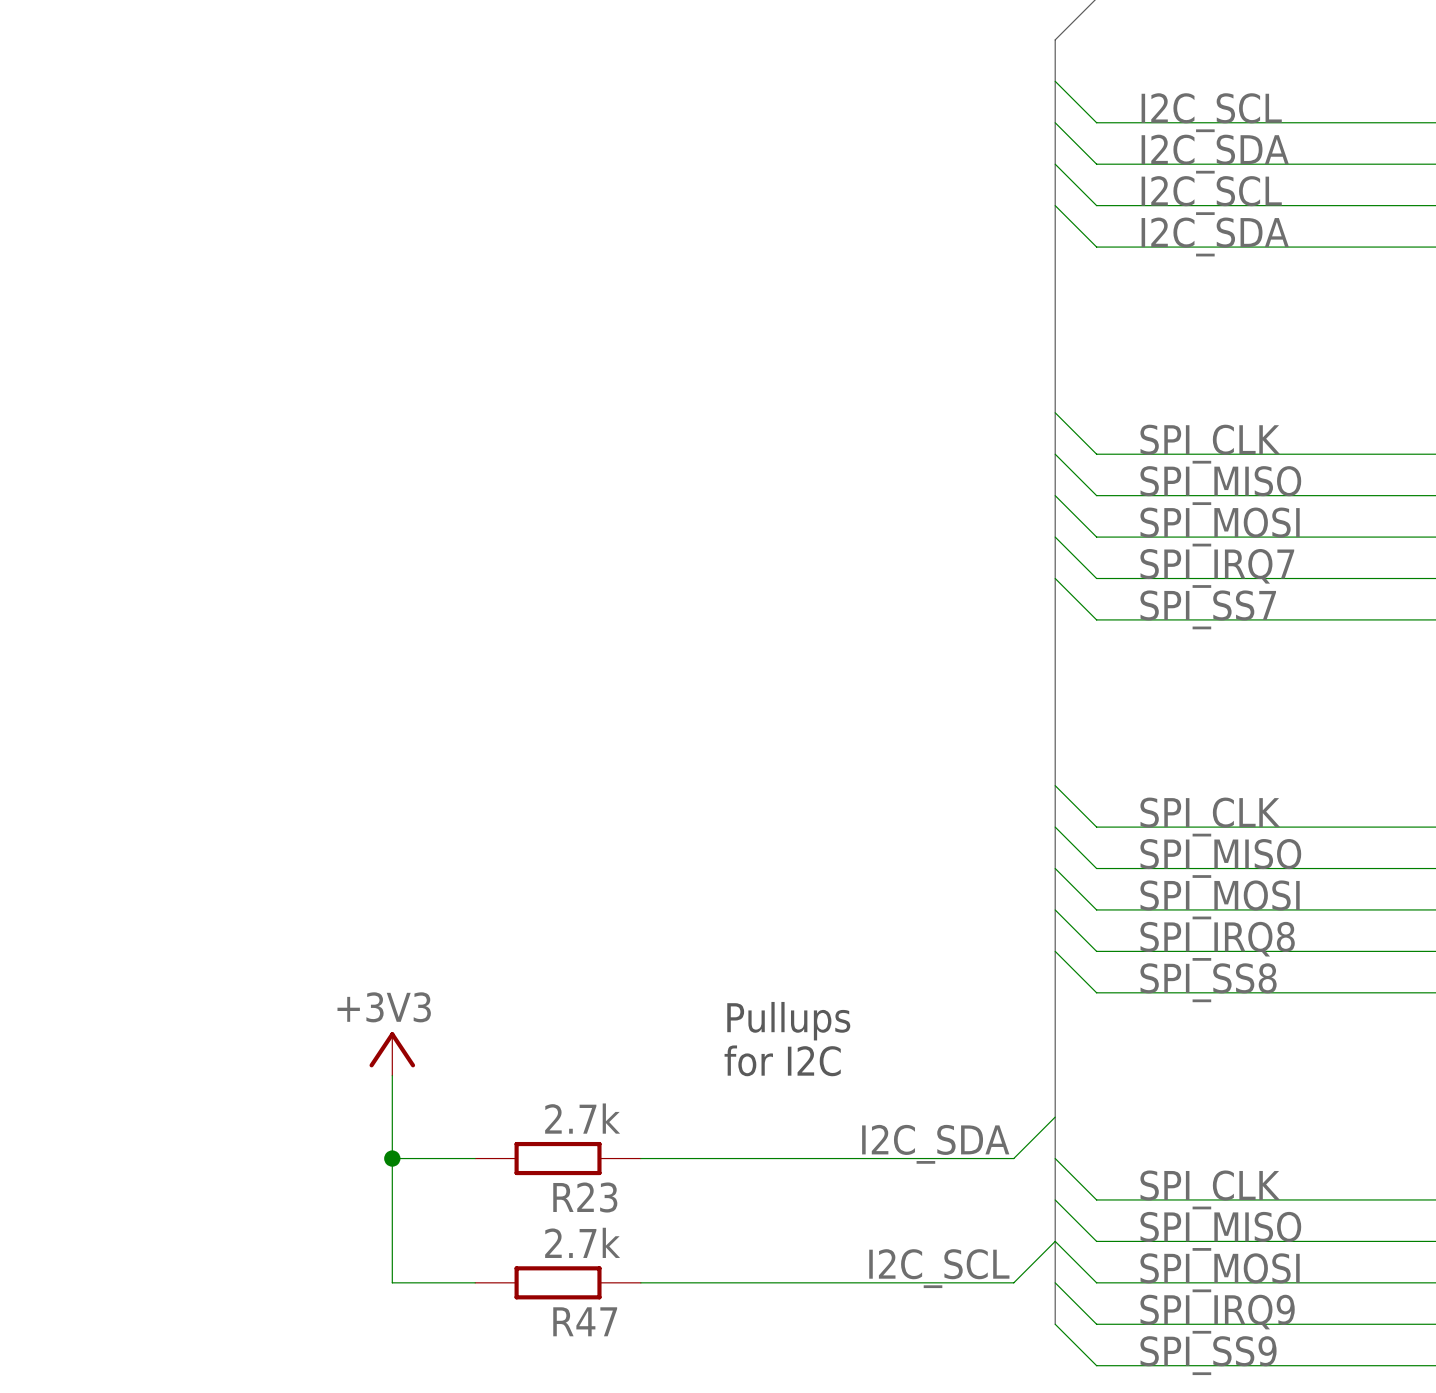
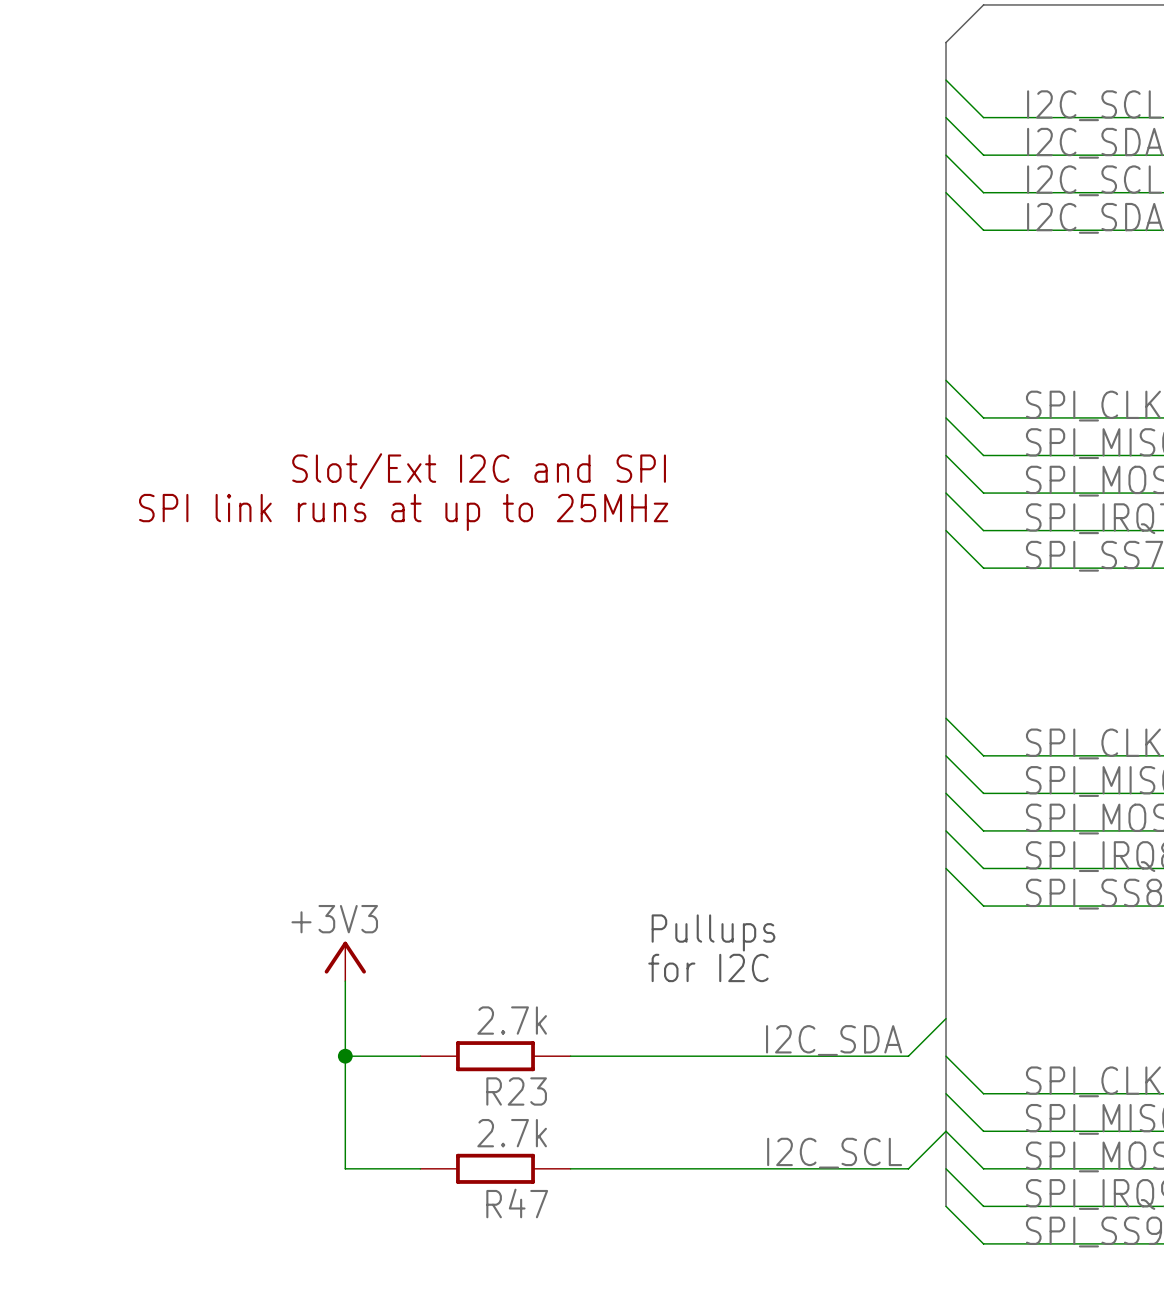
text: none -> Slot/Ext I2C and SPI (479, 471)
text: none -> SPI link runs at up to 25MHz (403, 512)

